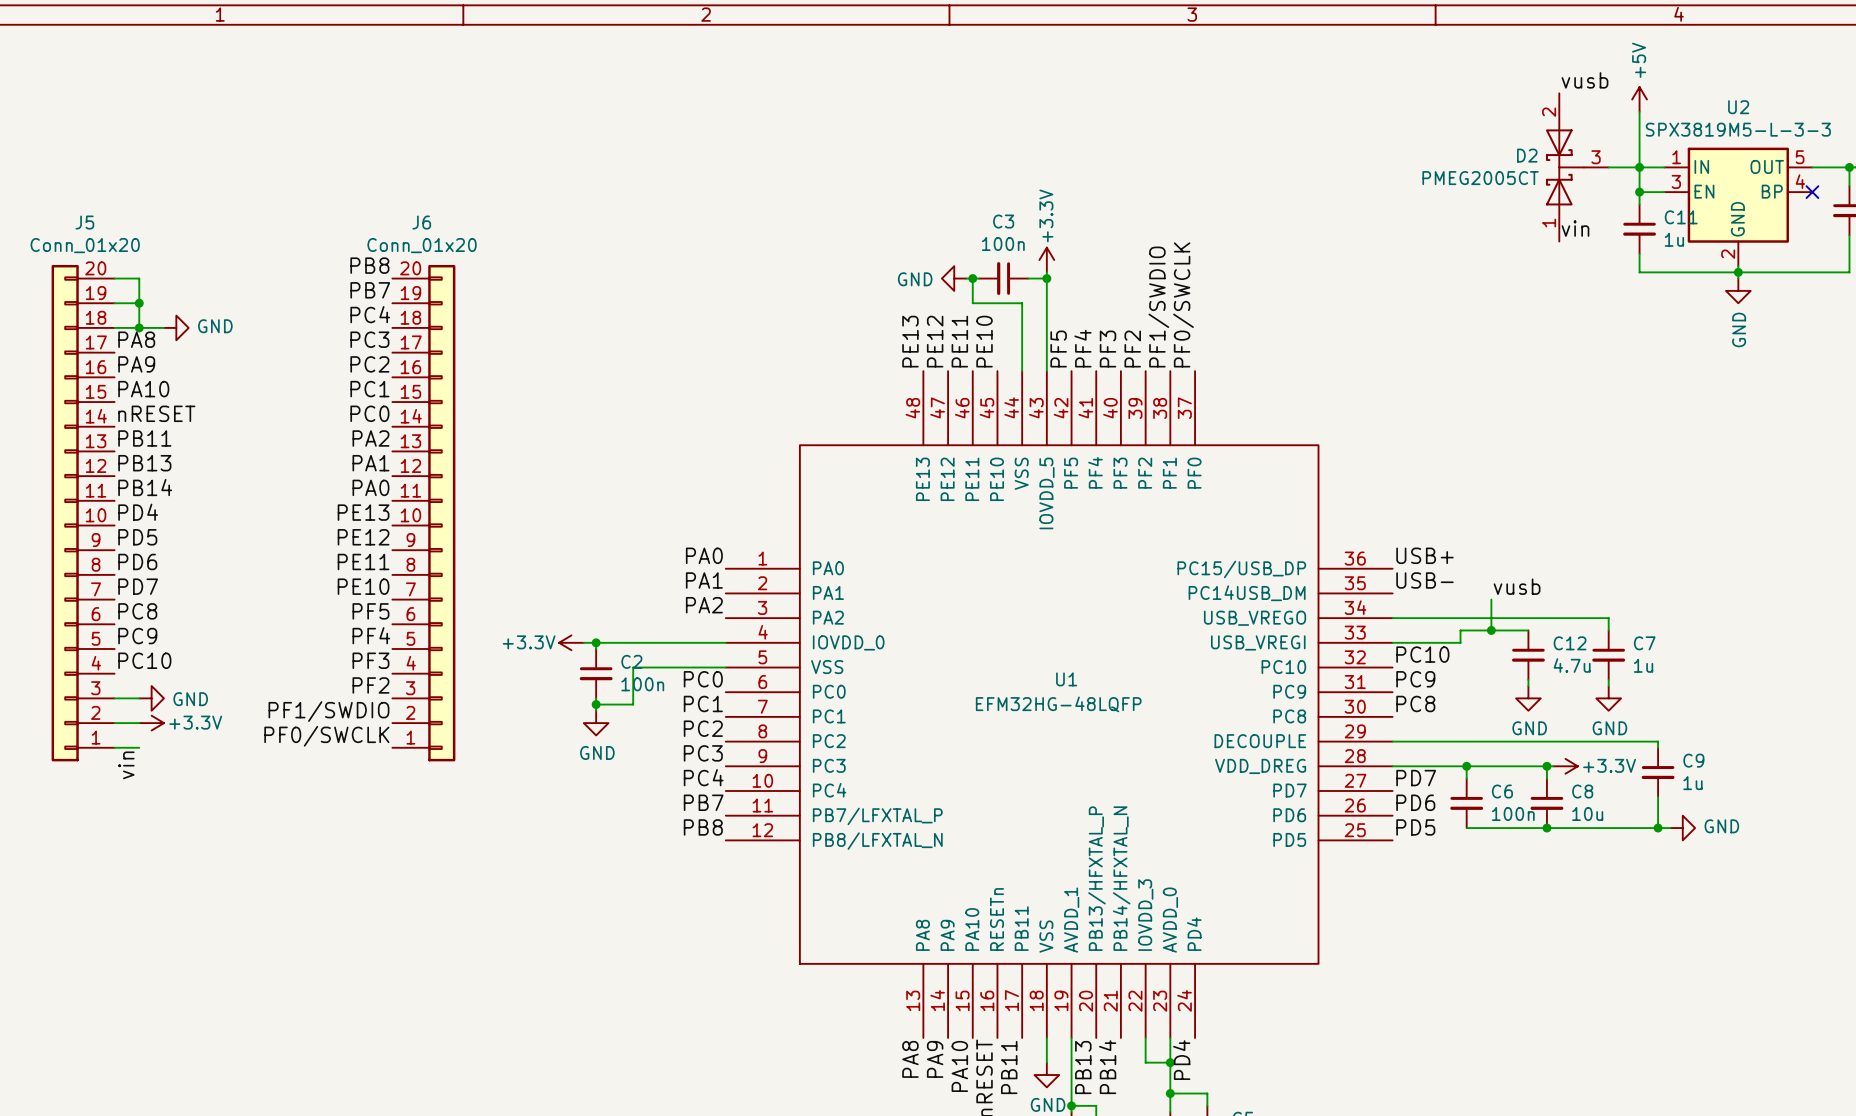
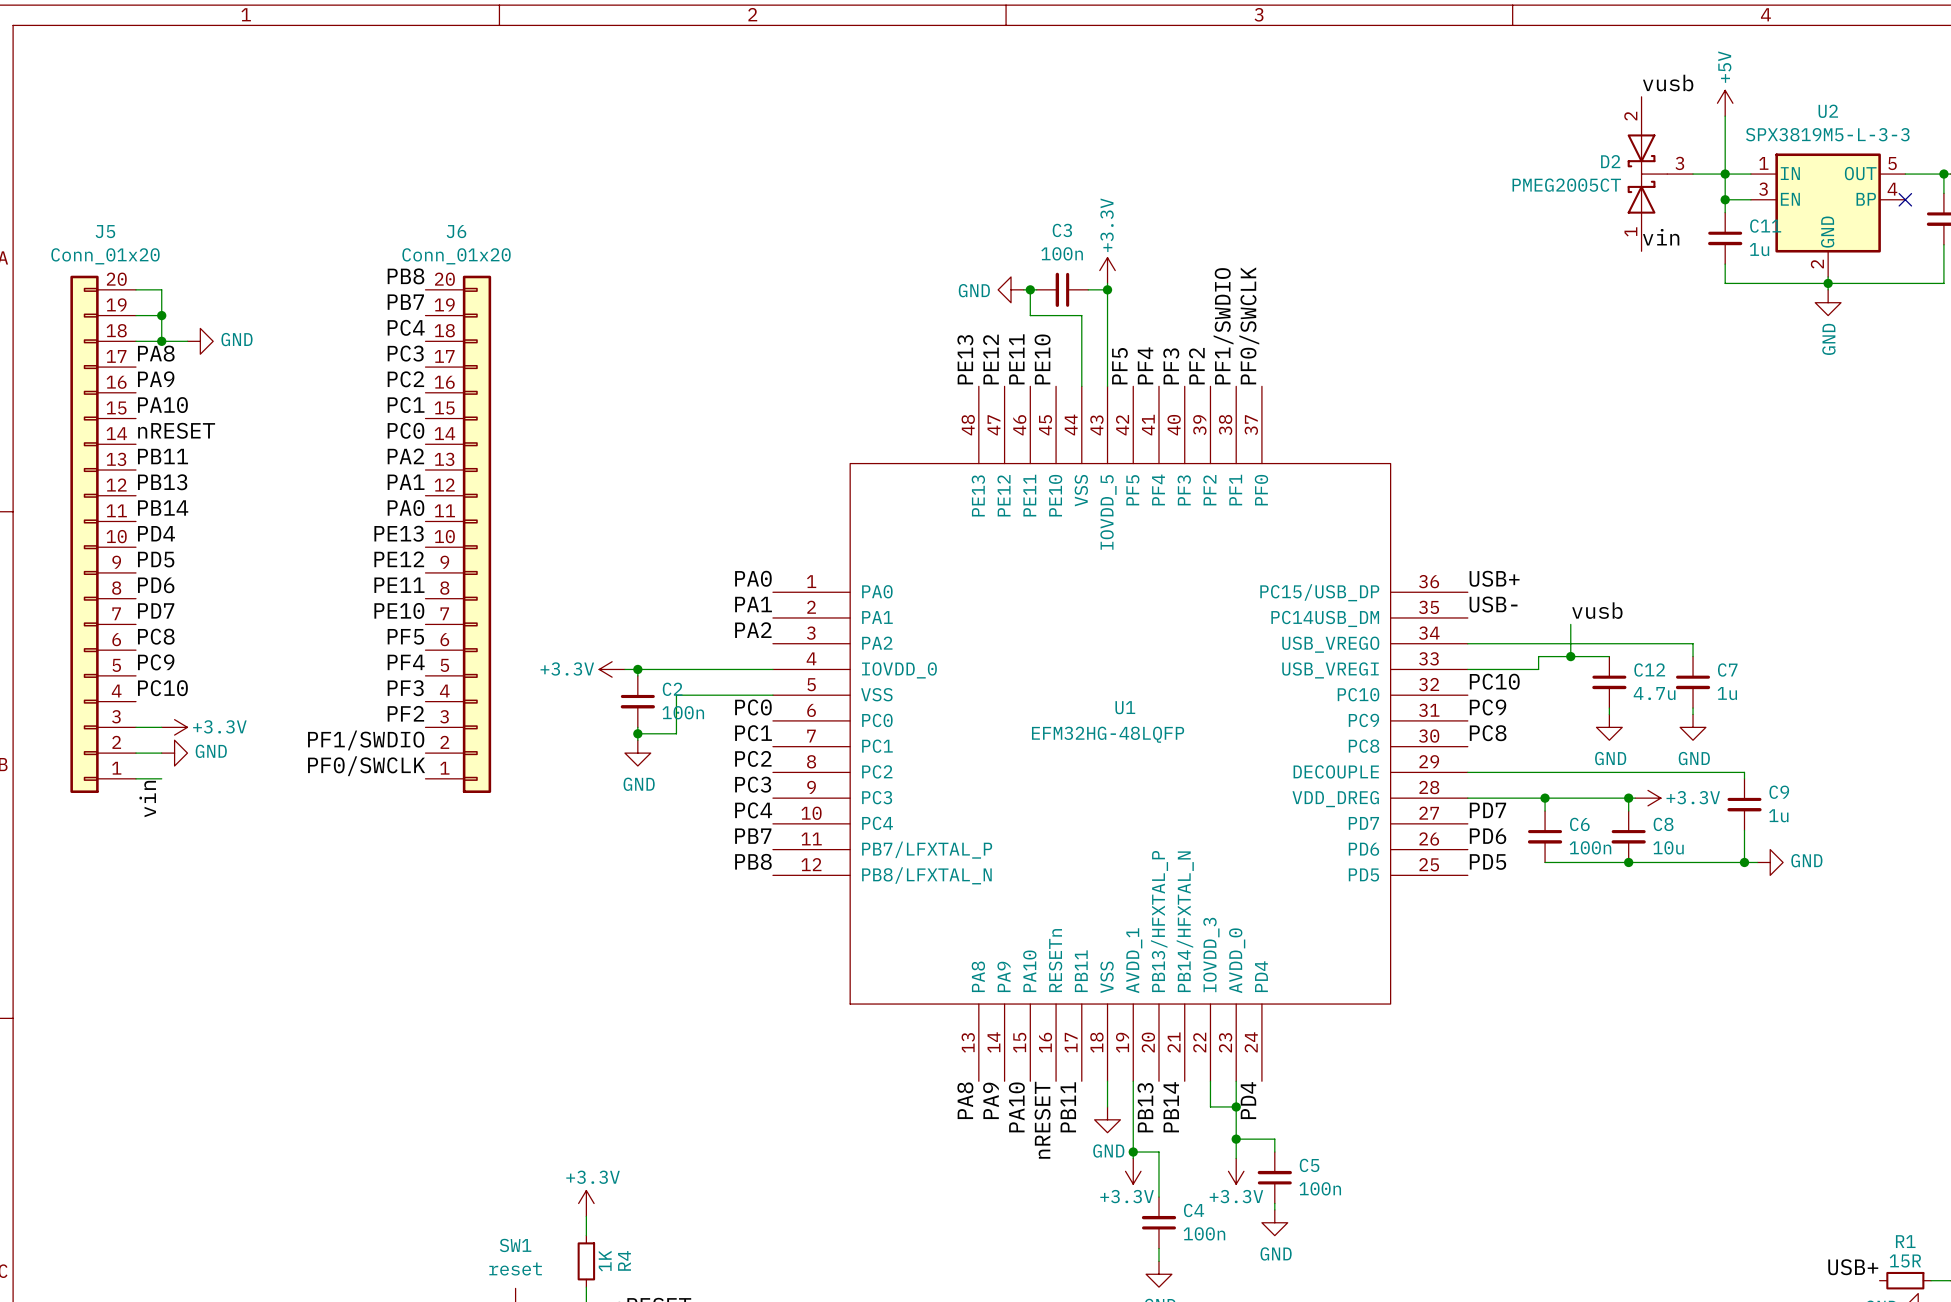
power symbol: GND (151, 698) -> +3.3V (174, 727)
power symbol: +3.3V (151, 723) -> GND (174, 753)

